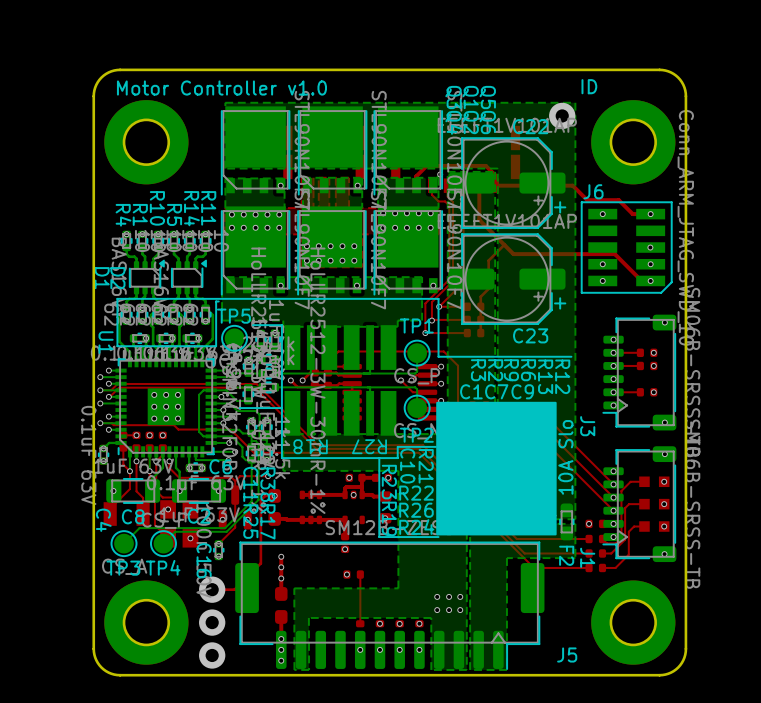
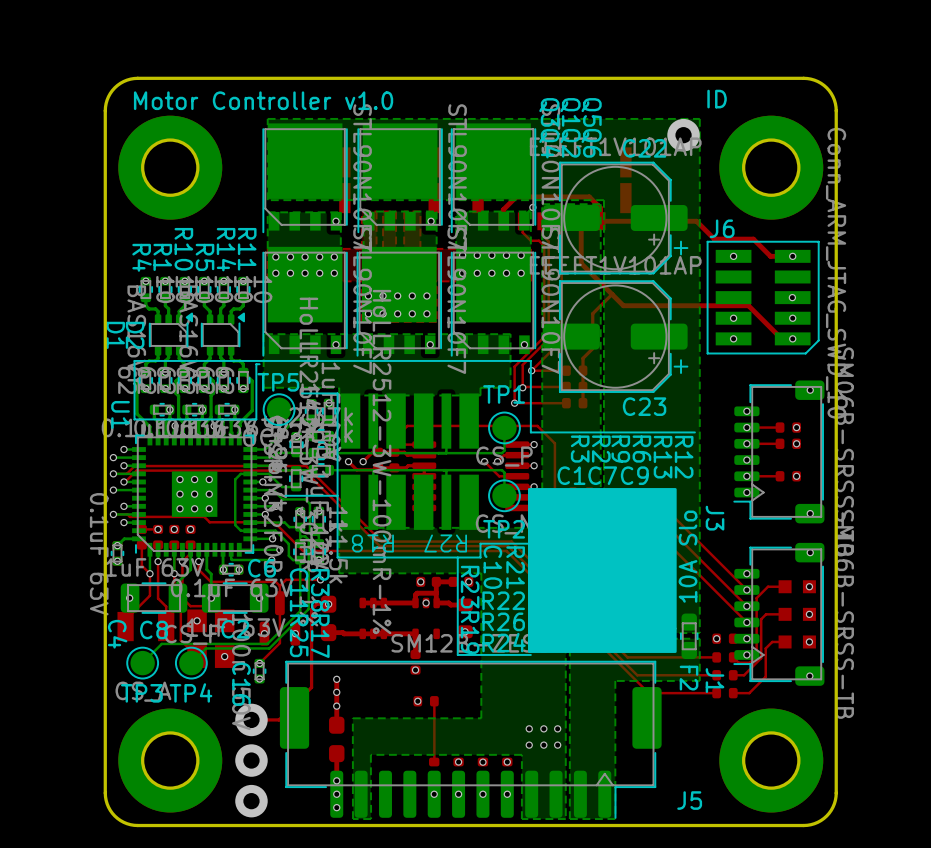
R27 value: HoLLR2512-3W-30mR-1% (317, 380) -> HoLLR2512-3W-100mR-1% (382, 462)

